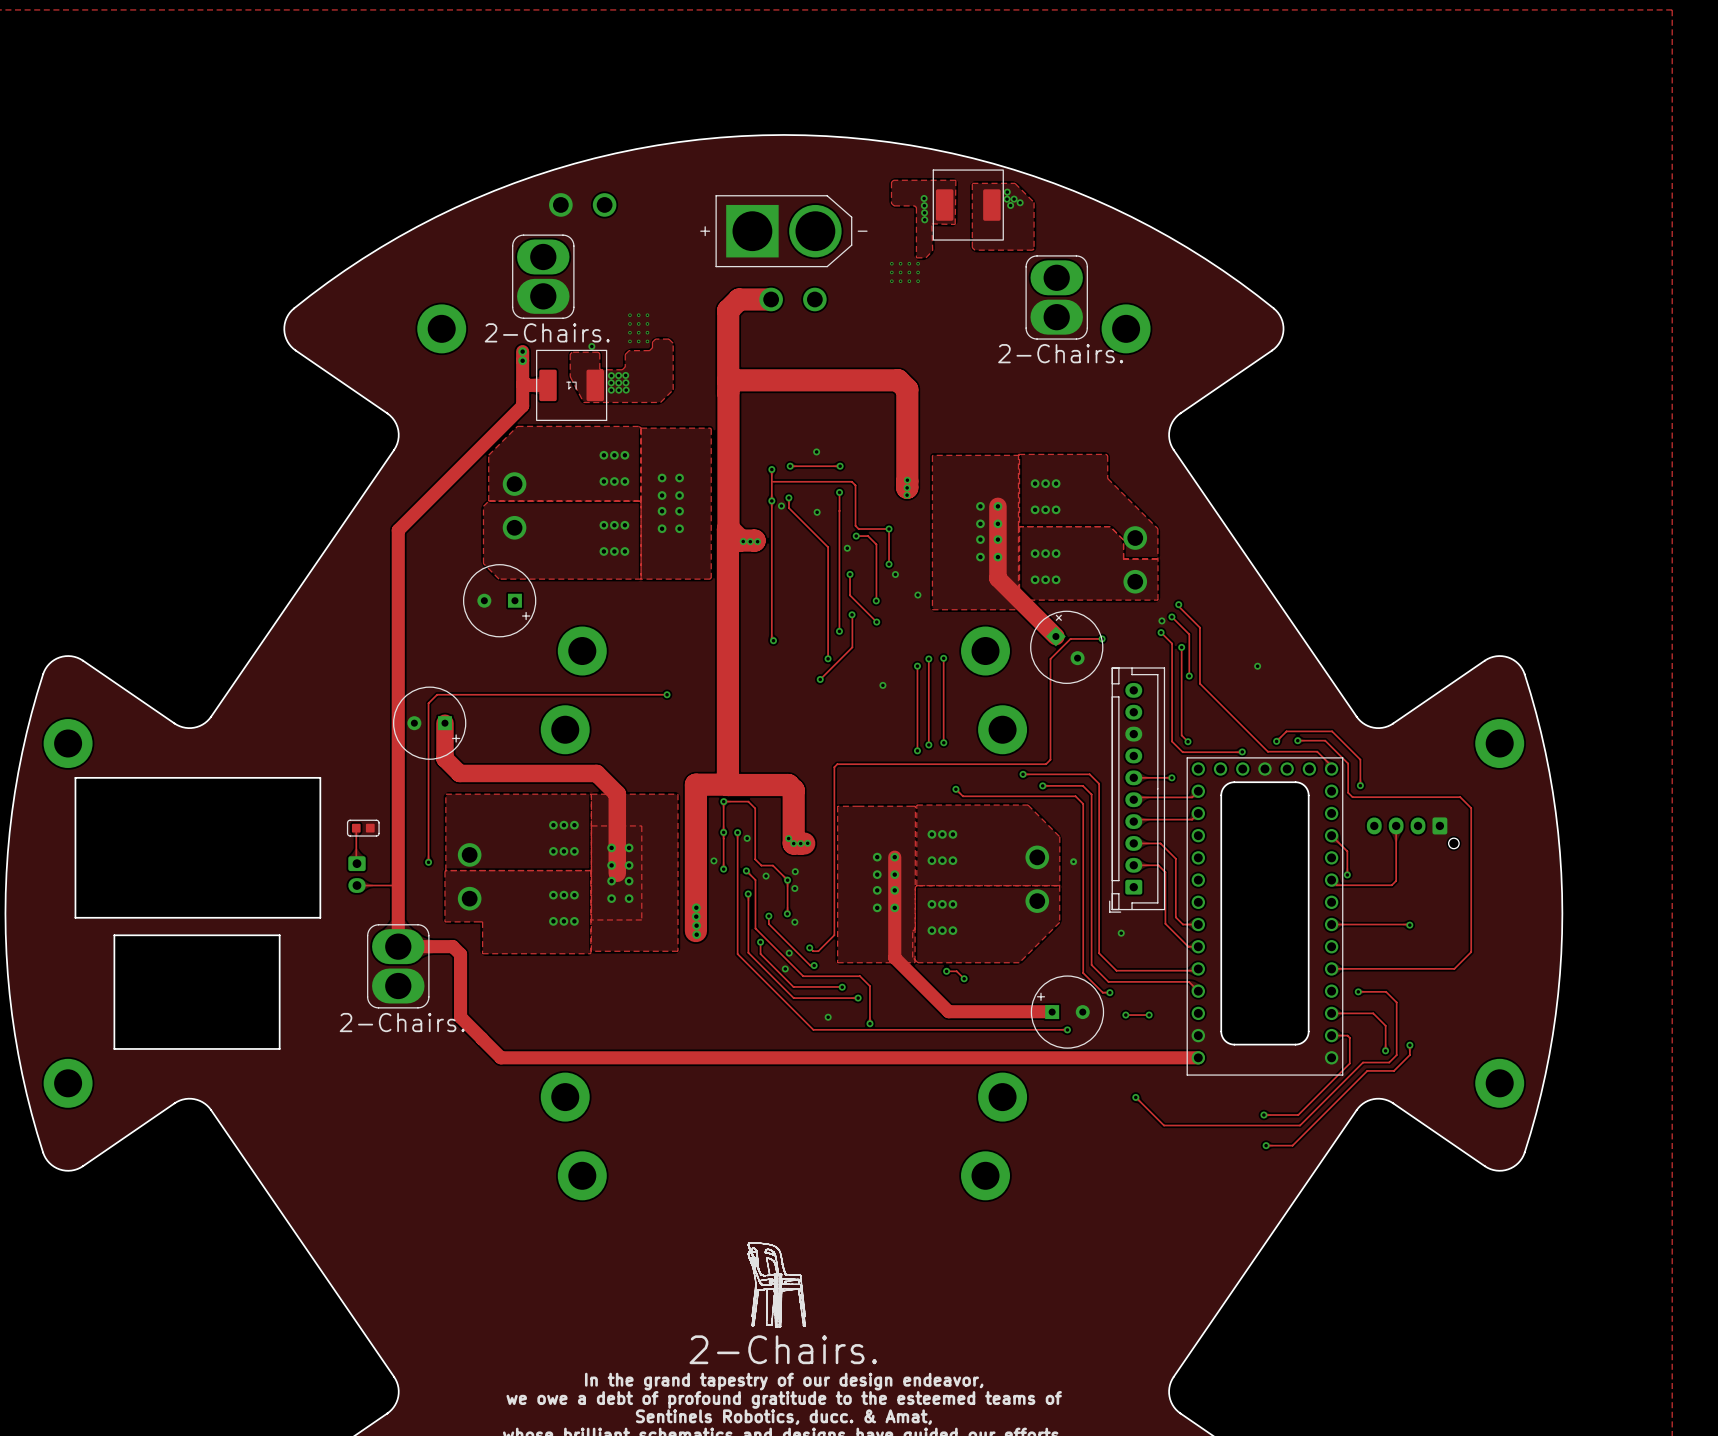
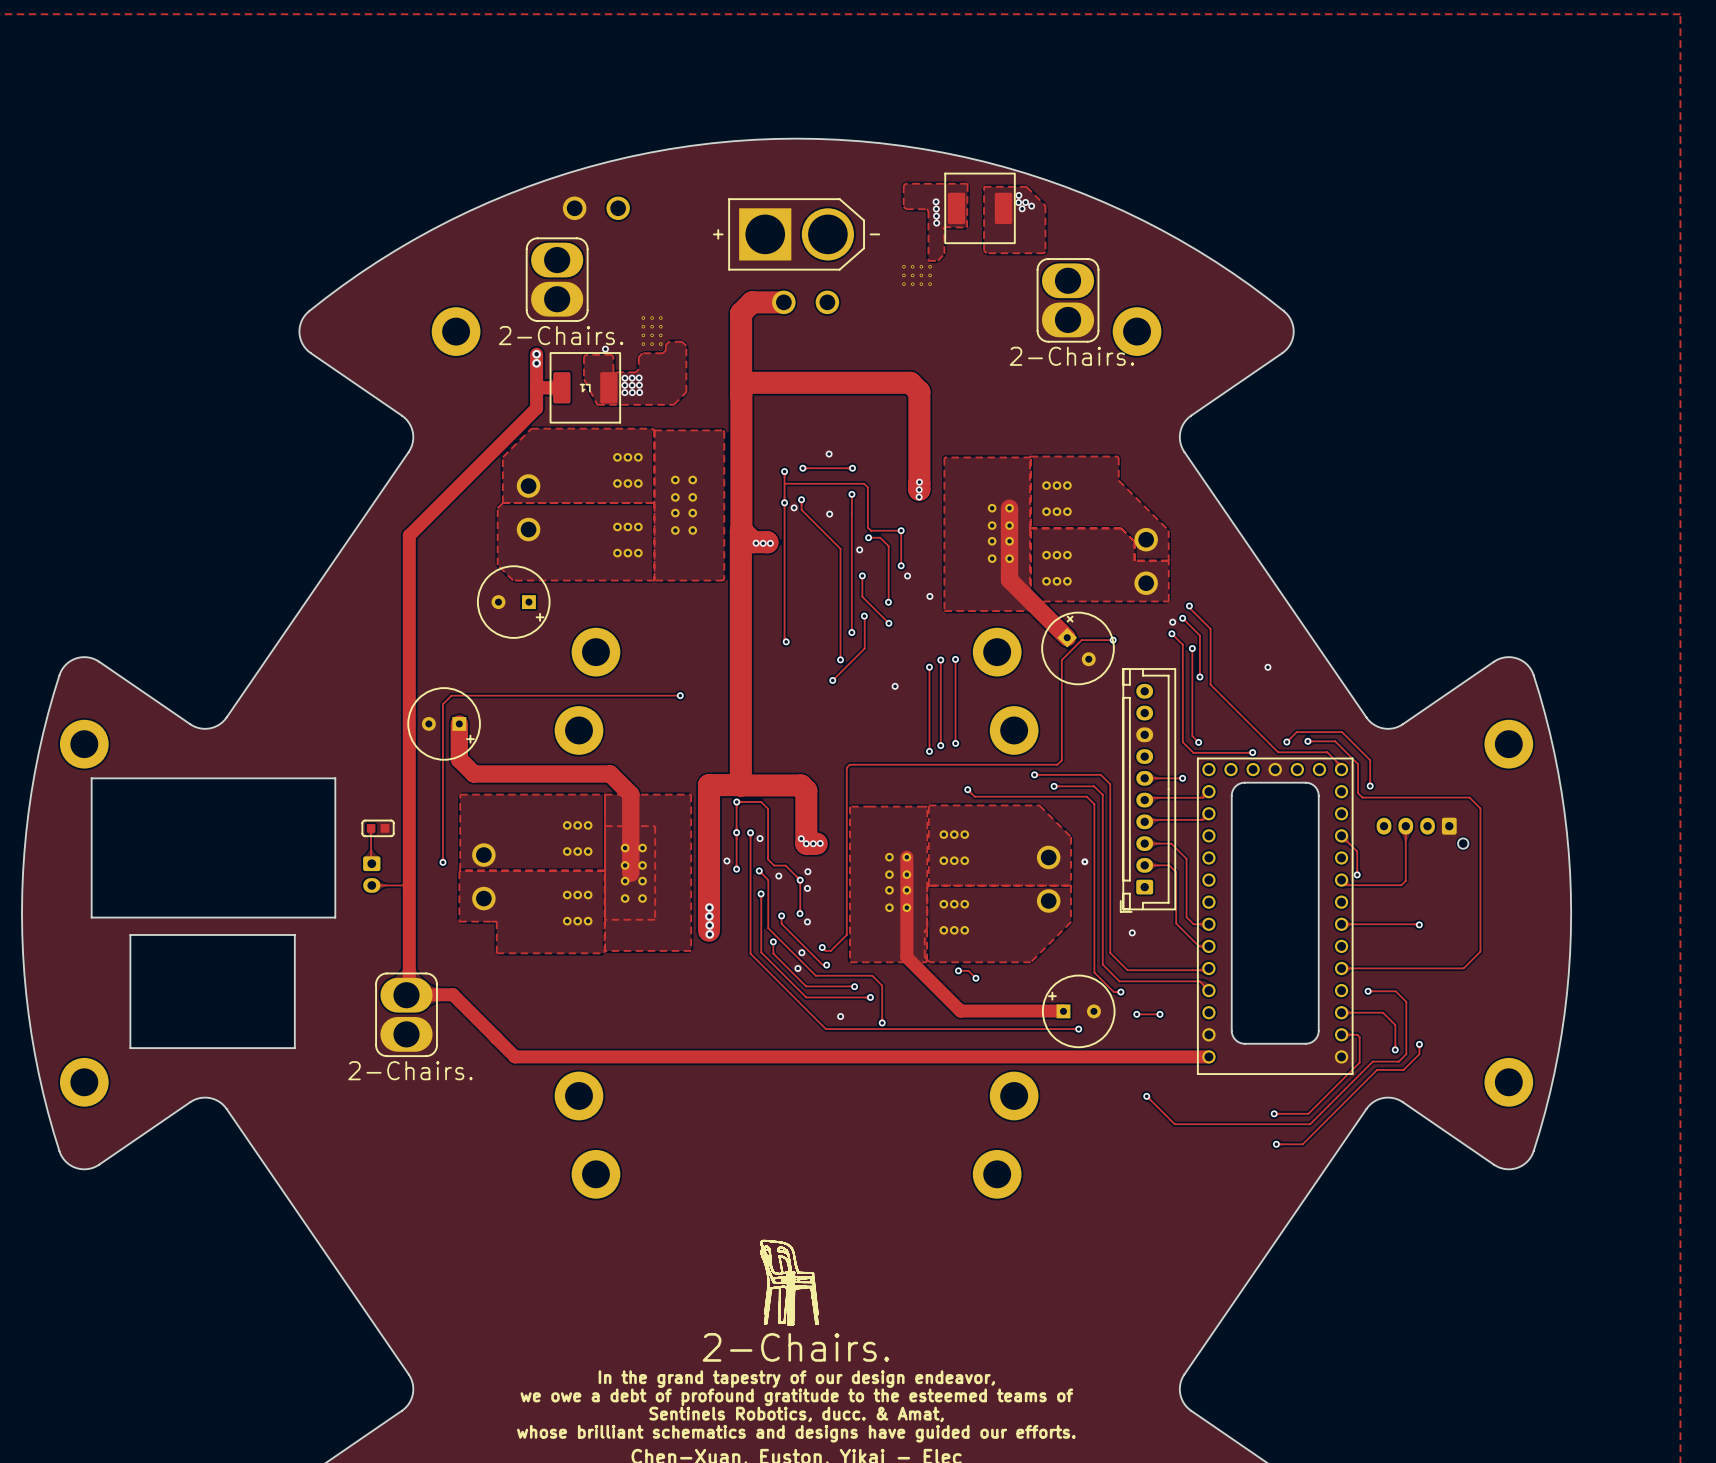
track: (398, 530) (398, 946) (452, 946) (460, 954) (460, 1017) -> (412, 532) (409, 535) (409, 992)
part position: (398, 966) -> (406, 1014)
track: none -> (406, 994) (453, 994) (474, 1016)

